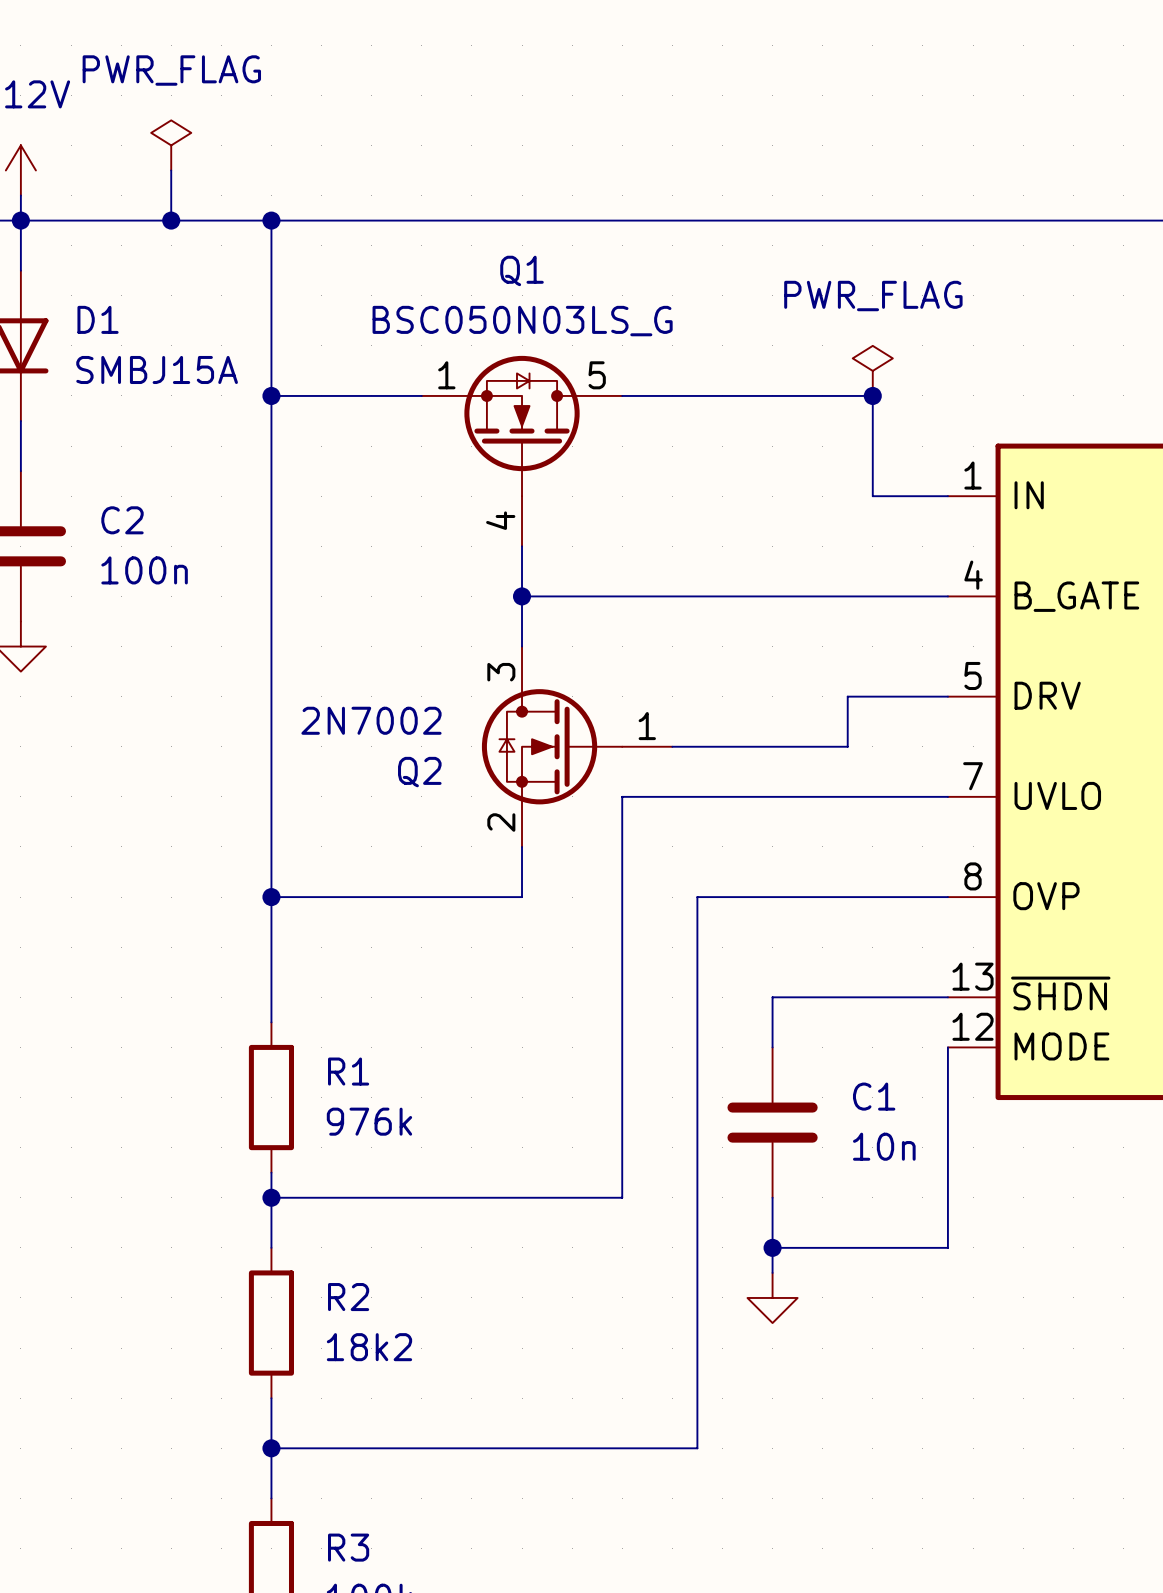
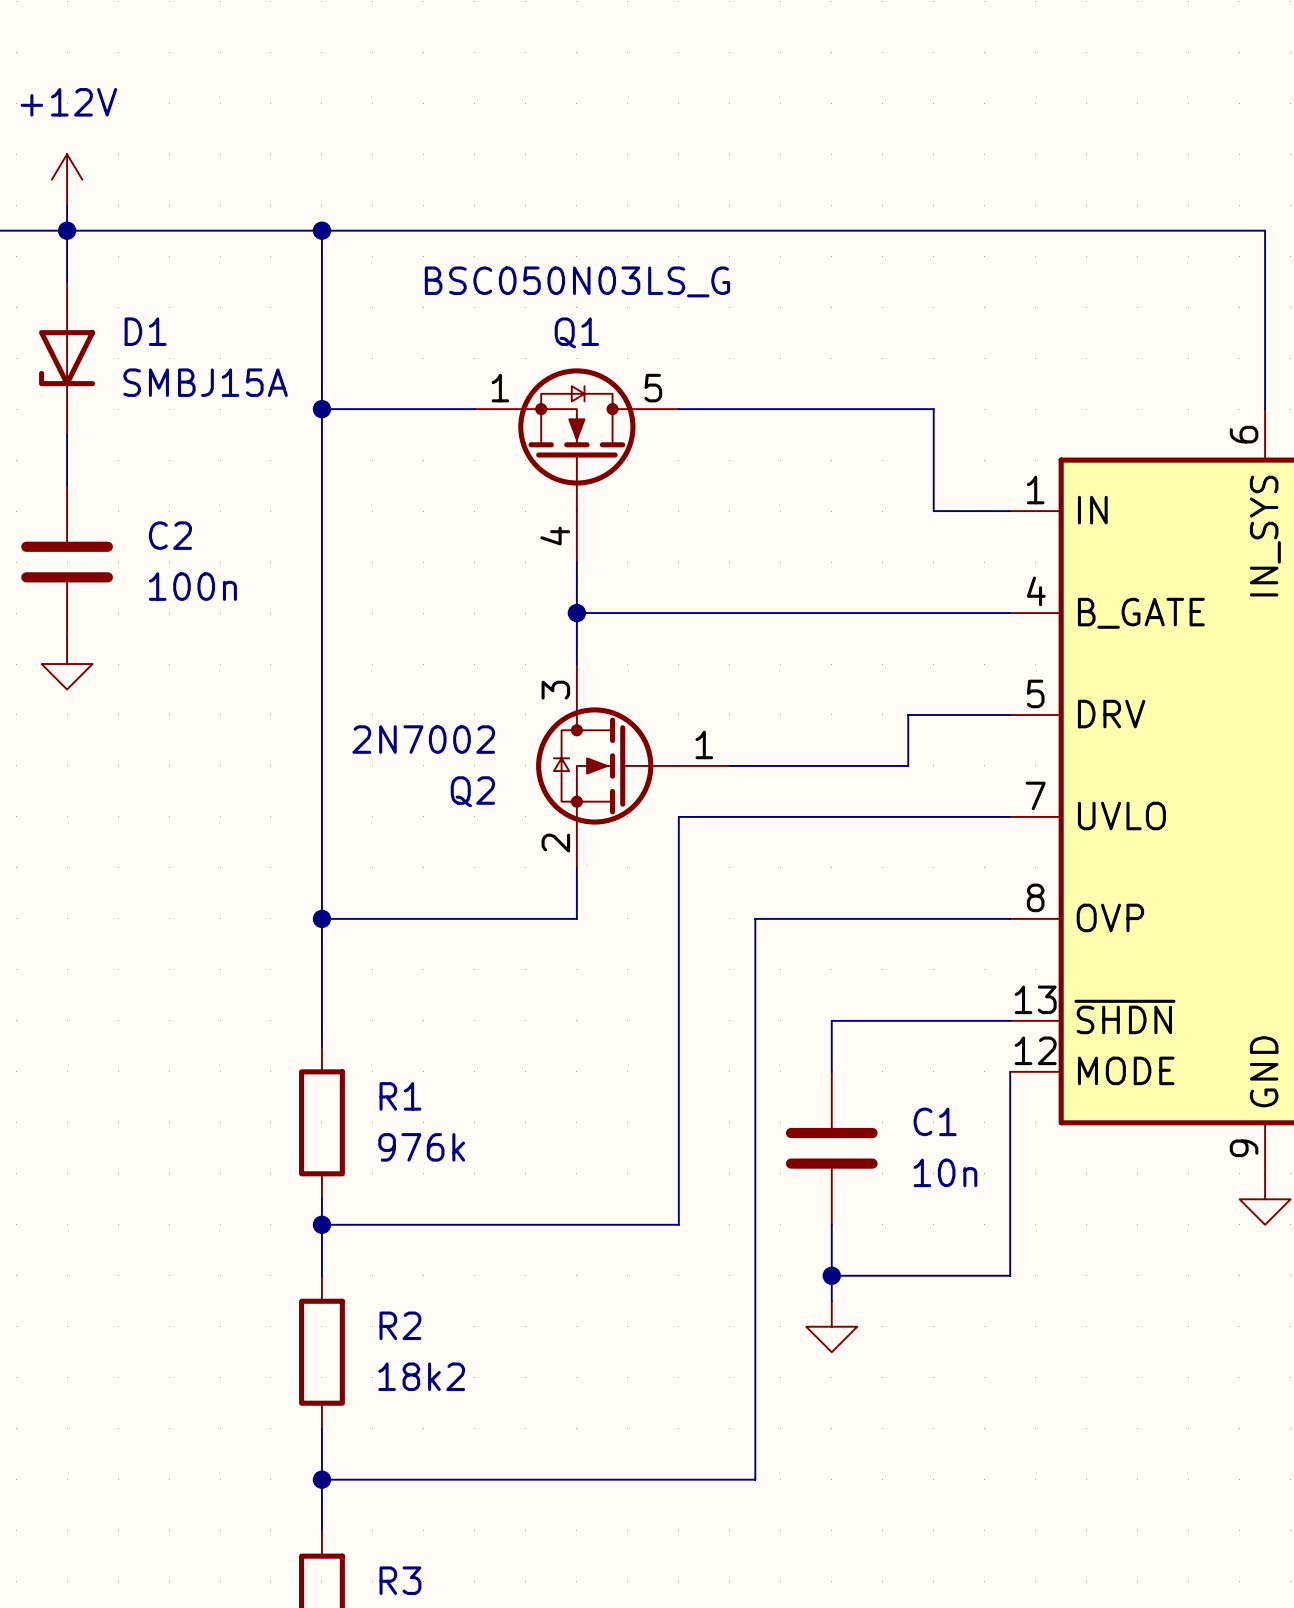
power symbol: PWR_FLAG (171, 145) -> none
wire: (171, 170) (171, 220) -> none
junction: (171, 220) -> none
Q1 name position: Q1 (522, 270) -> Q1 (576, 332)
Q1 value position: BSC050N03LS_G (522, 321) -> BSC050N03LS_G (577, 281)
power symbol: PWR_FLAG (872, 370) -> none
junction: (872, 395) -> none

